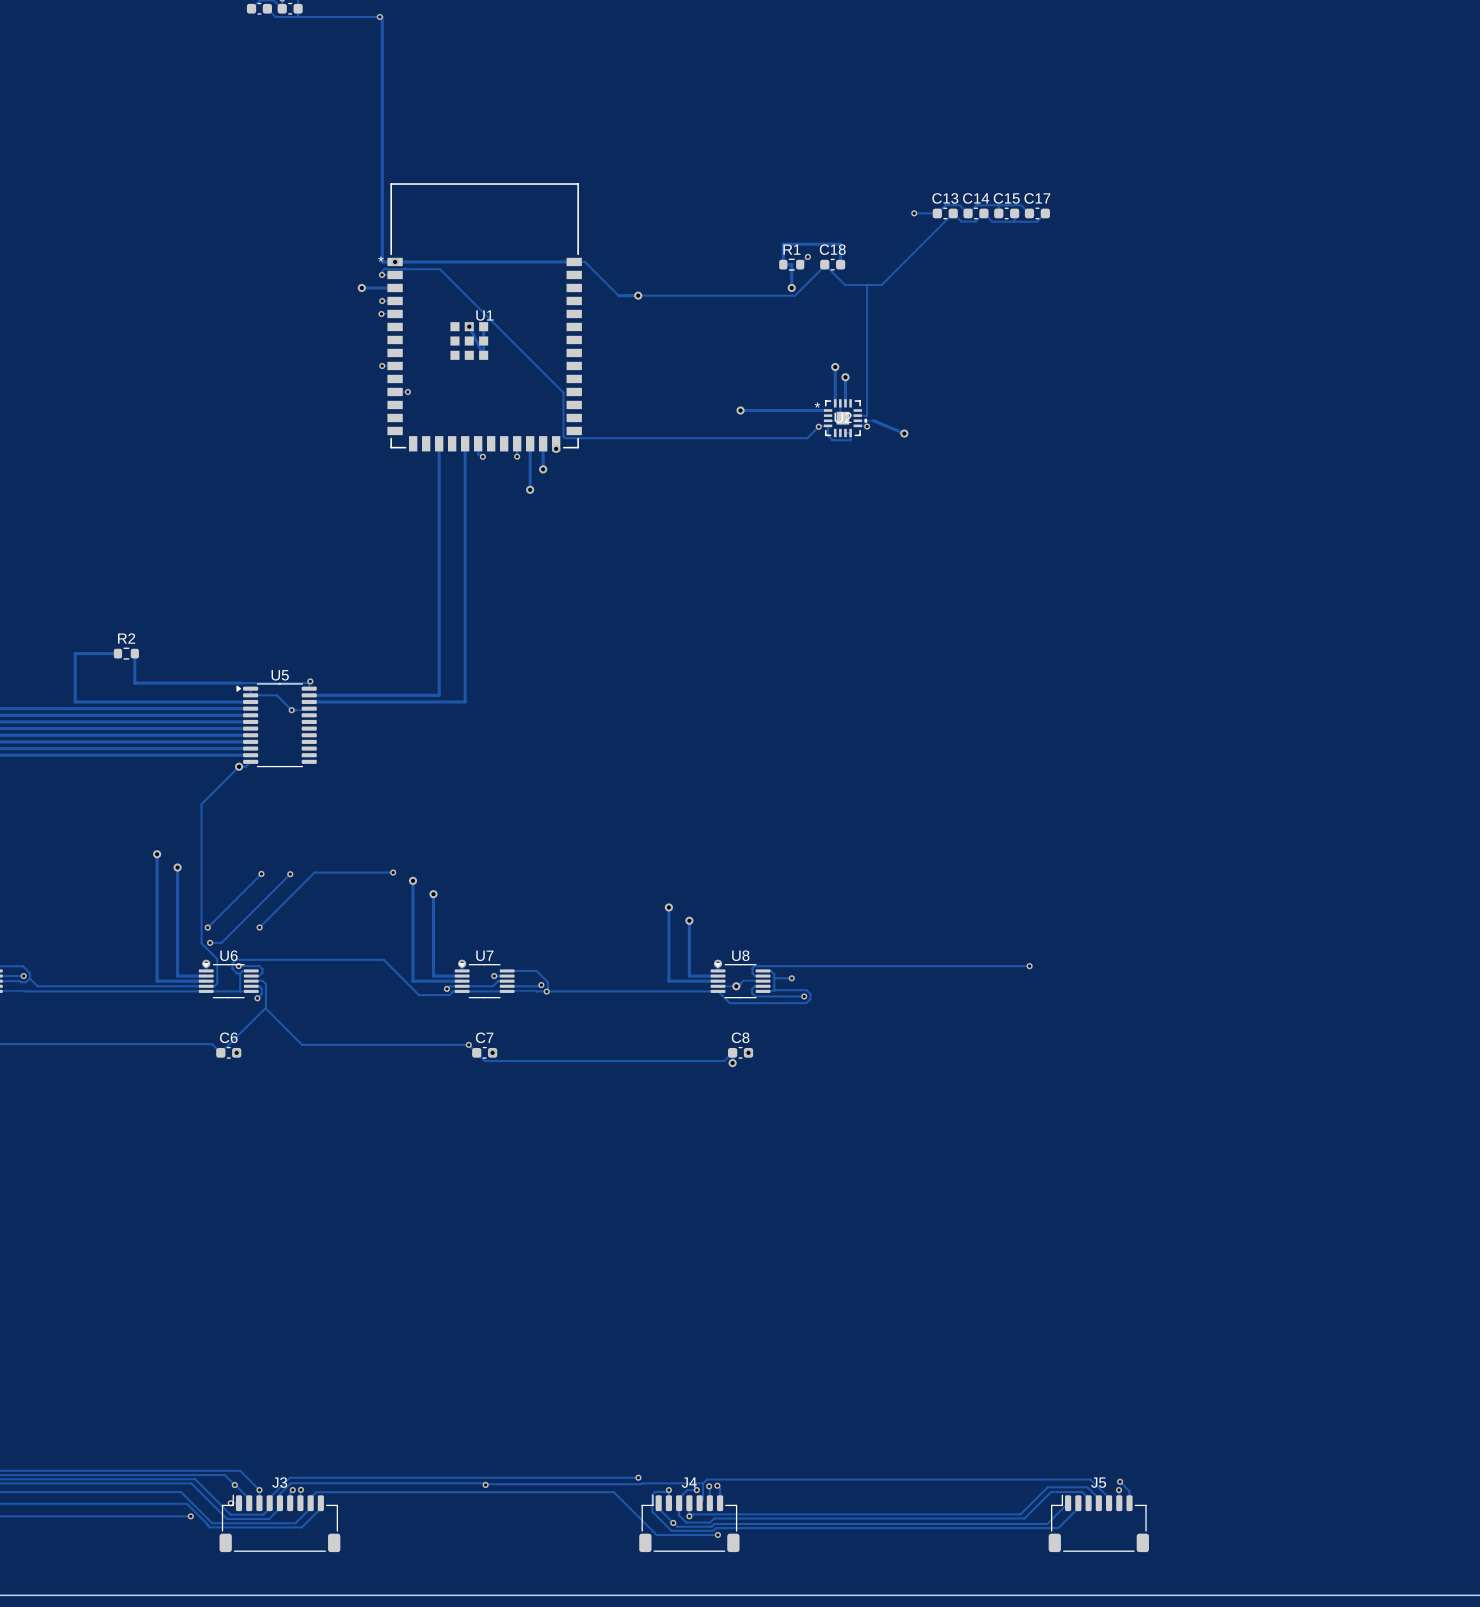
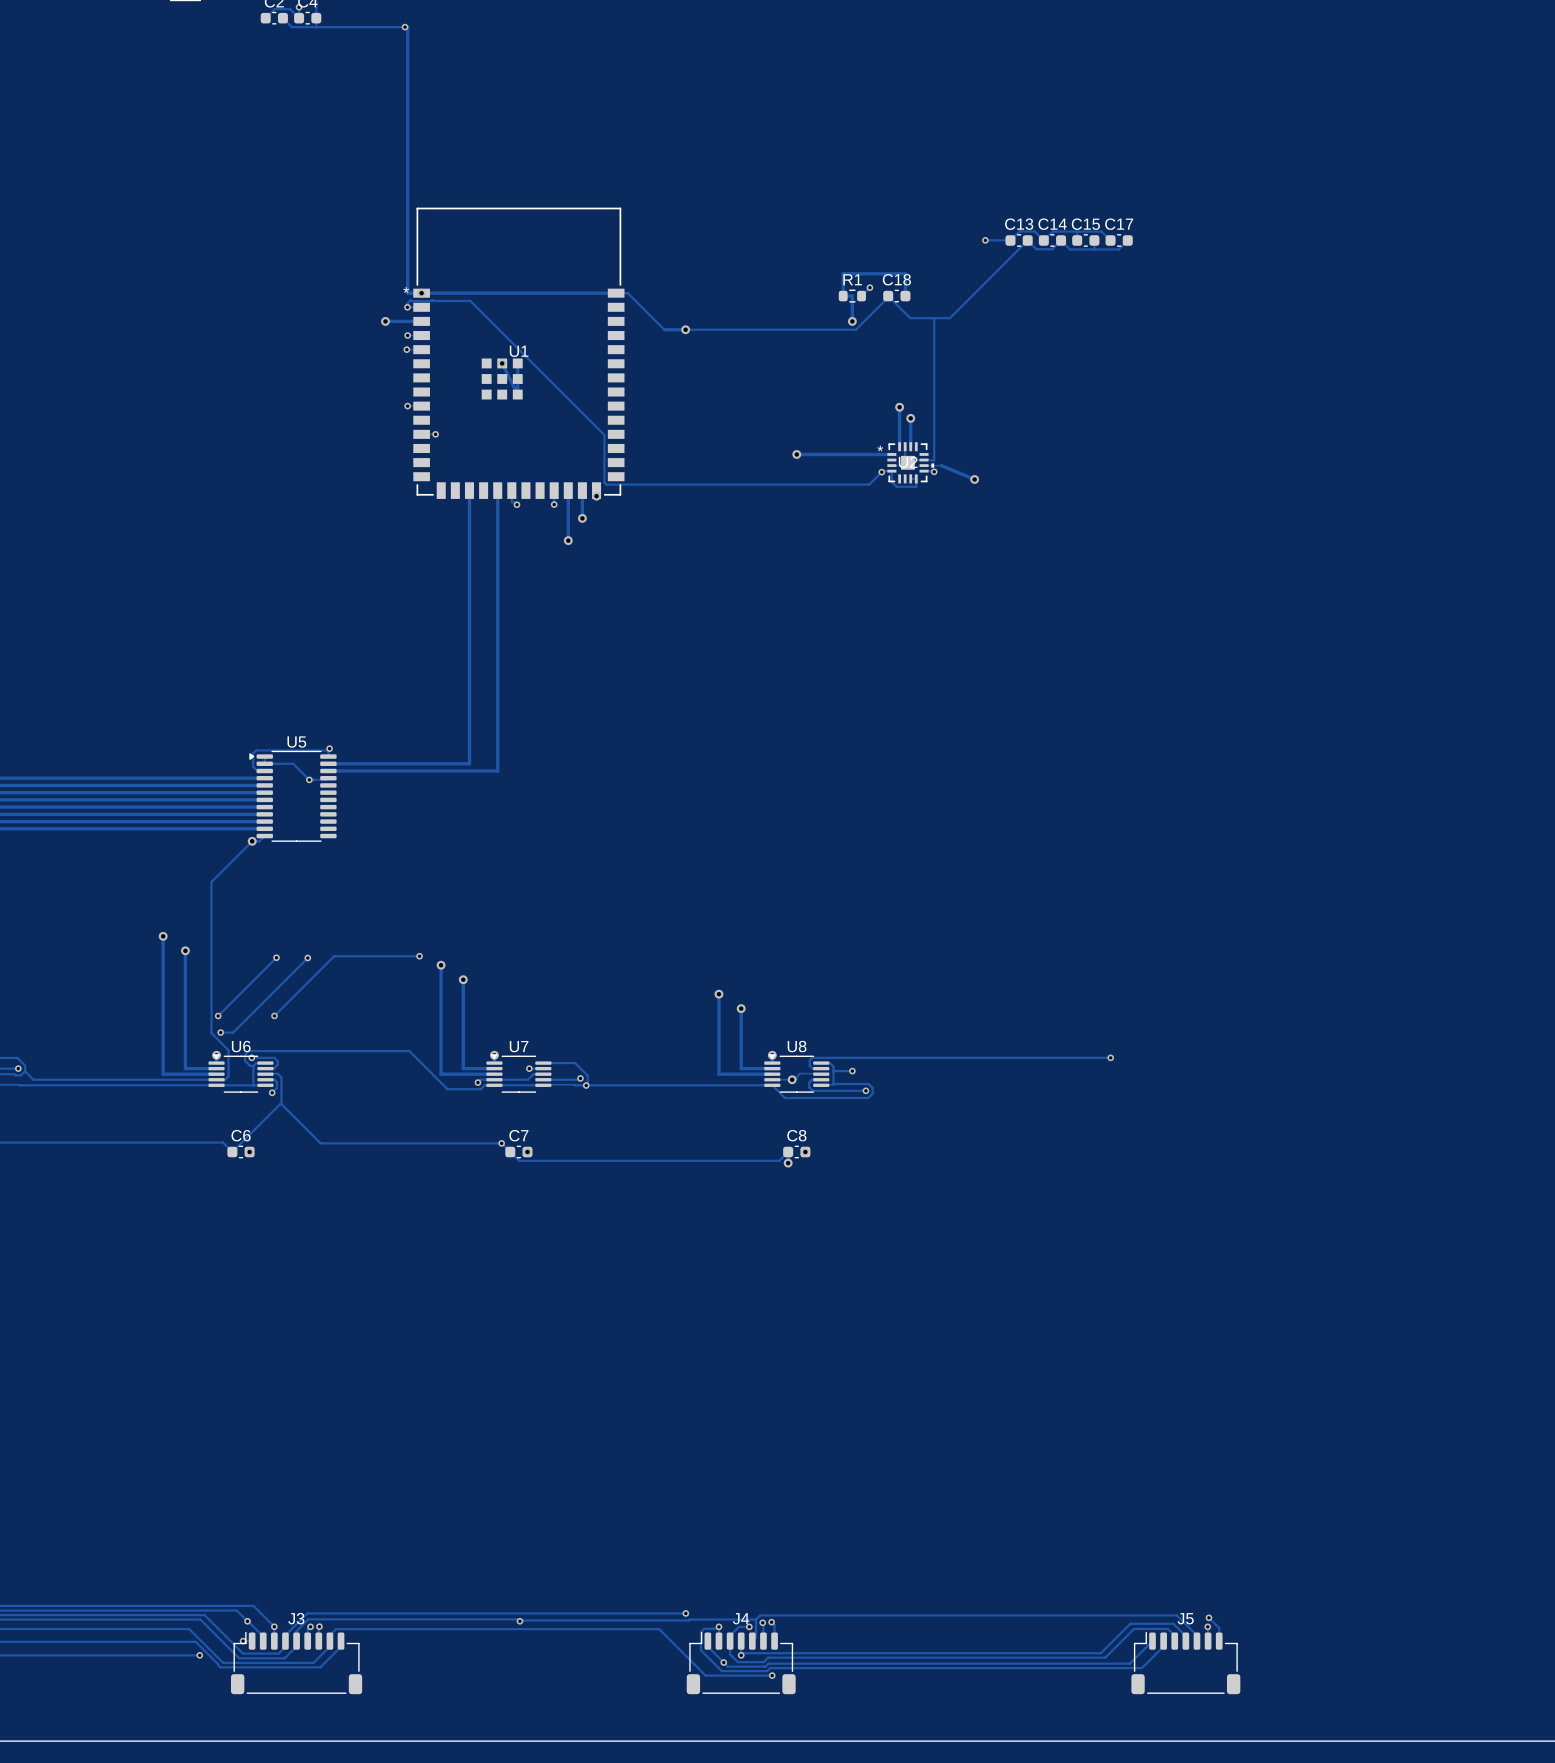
track: (117, 653) (75, 653) (75, 701) (243, 701) -> none
R2: (126, 653) -> none
track: (134, 653) (134, 683) (242, 683) -> (257, 771) (253, 766) (253, 753) (256, 750)

